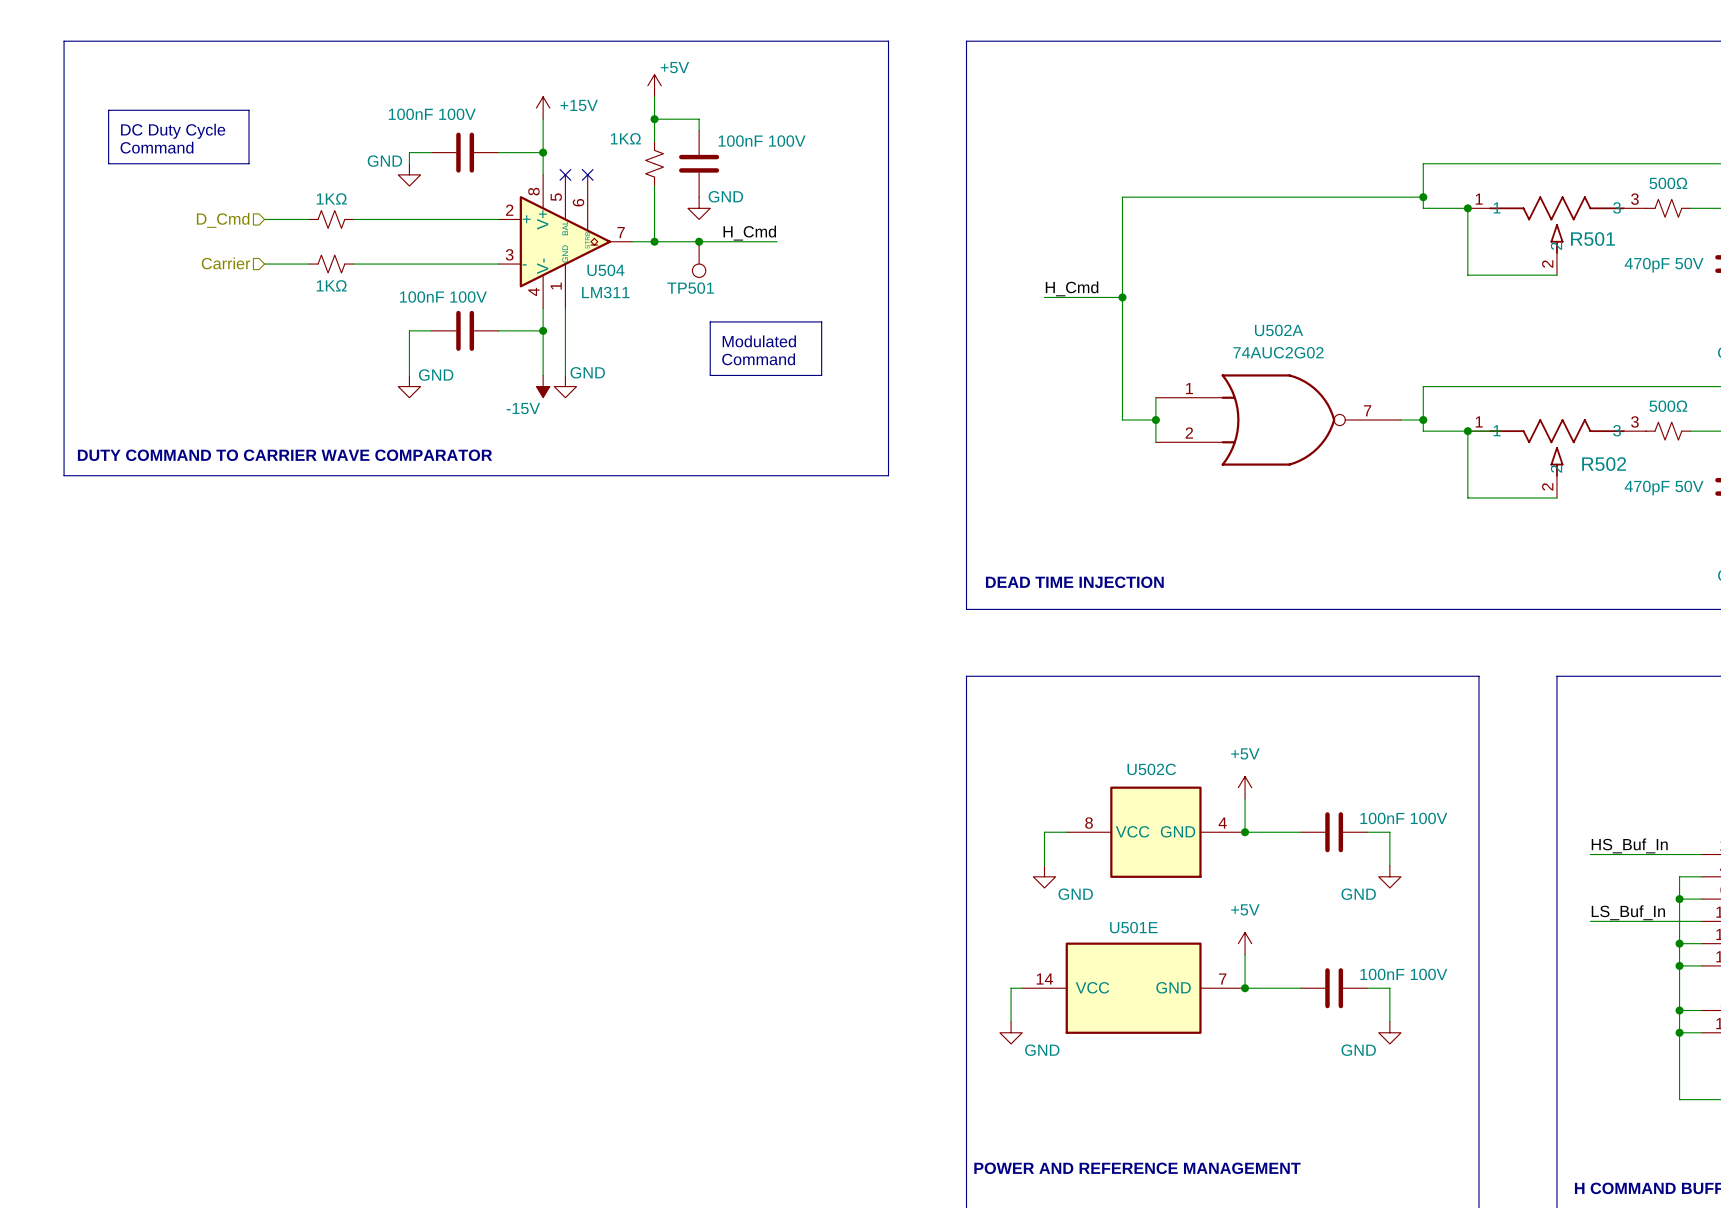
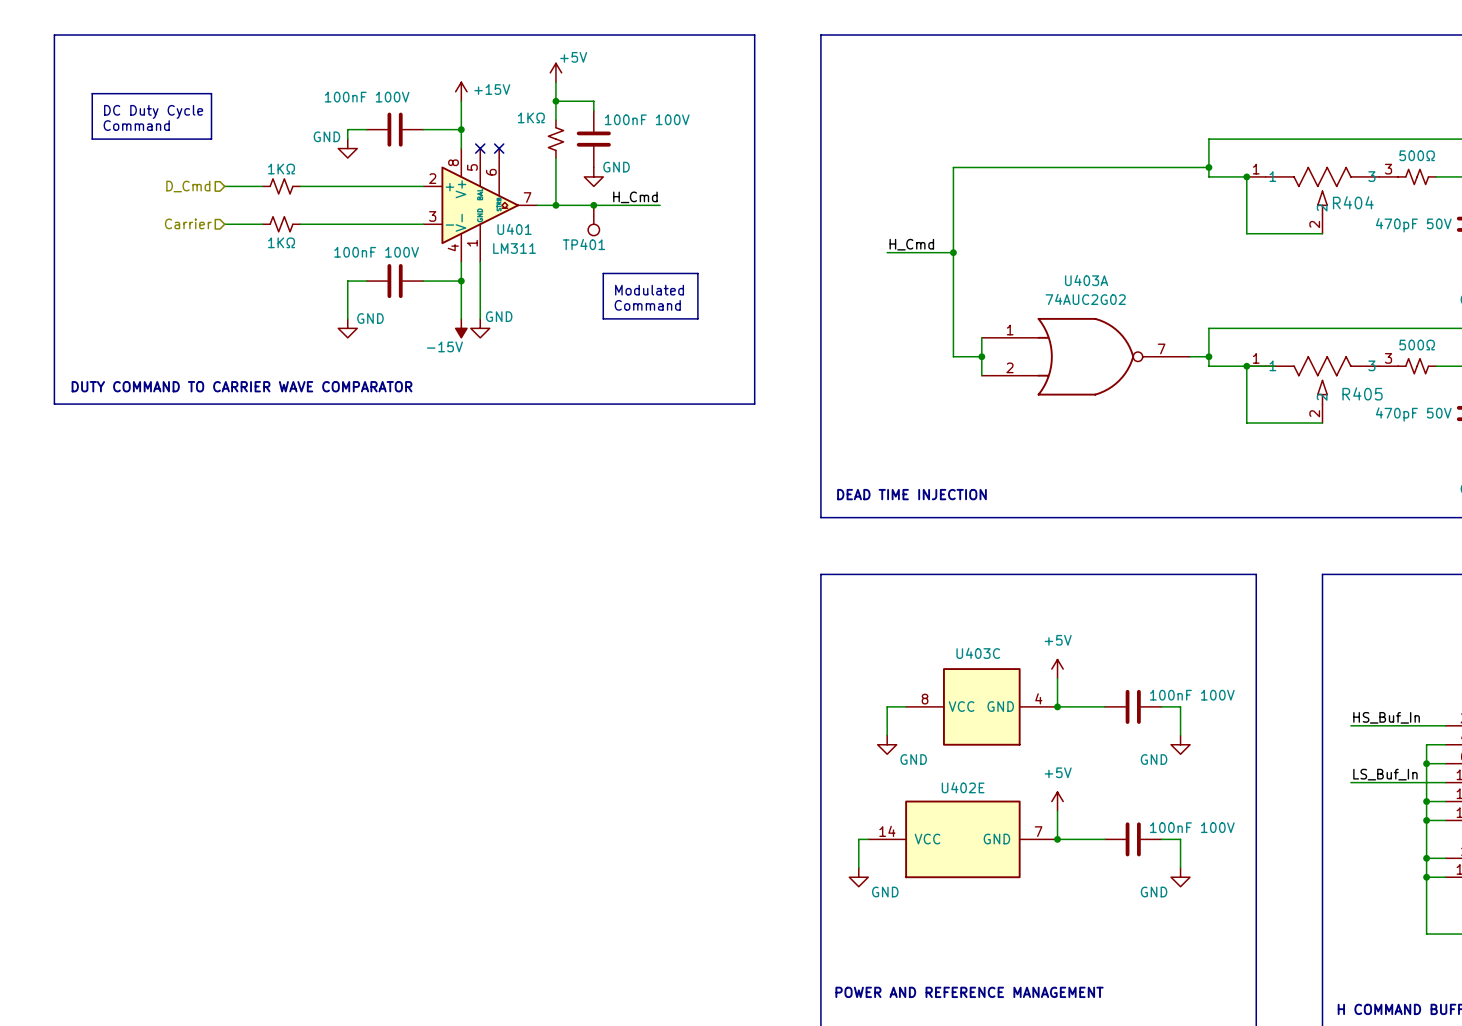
R501 name: R501 (1592, 239) -> R404 (1353, 202)
U504 name: U504 (605, 270) -> U401 (514, 229)
TP501 name: TP501 (690, 288) -> TP401 (584, 244)
U502A name: U502A (1279, 330) -> U403A (1086, 280)
R502 name: R502 (1604, 464) -> R405 (1362, 393)
U502C name: U502C (1151, 769) -> U403C (978, 653)
U501E name: U501E (1133, 927) -> U402E (963, 787)

